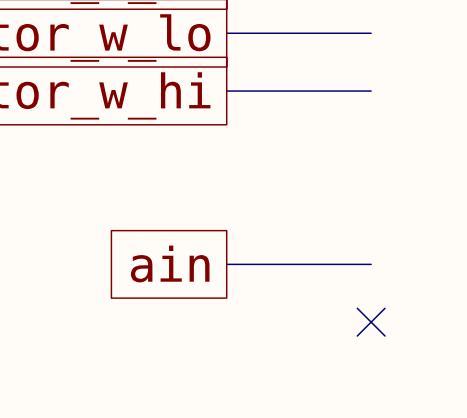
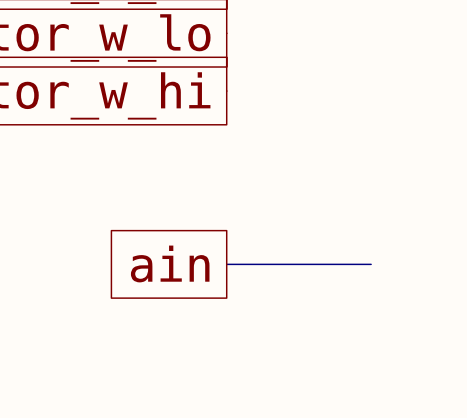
wire: (226, 33) (371, 33) -> none
wire: (226, 91) (371, 91) -> none
no-connect mark: (371, 322) -> none

